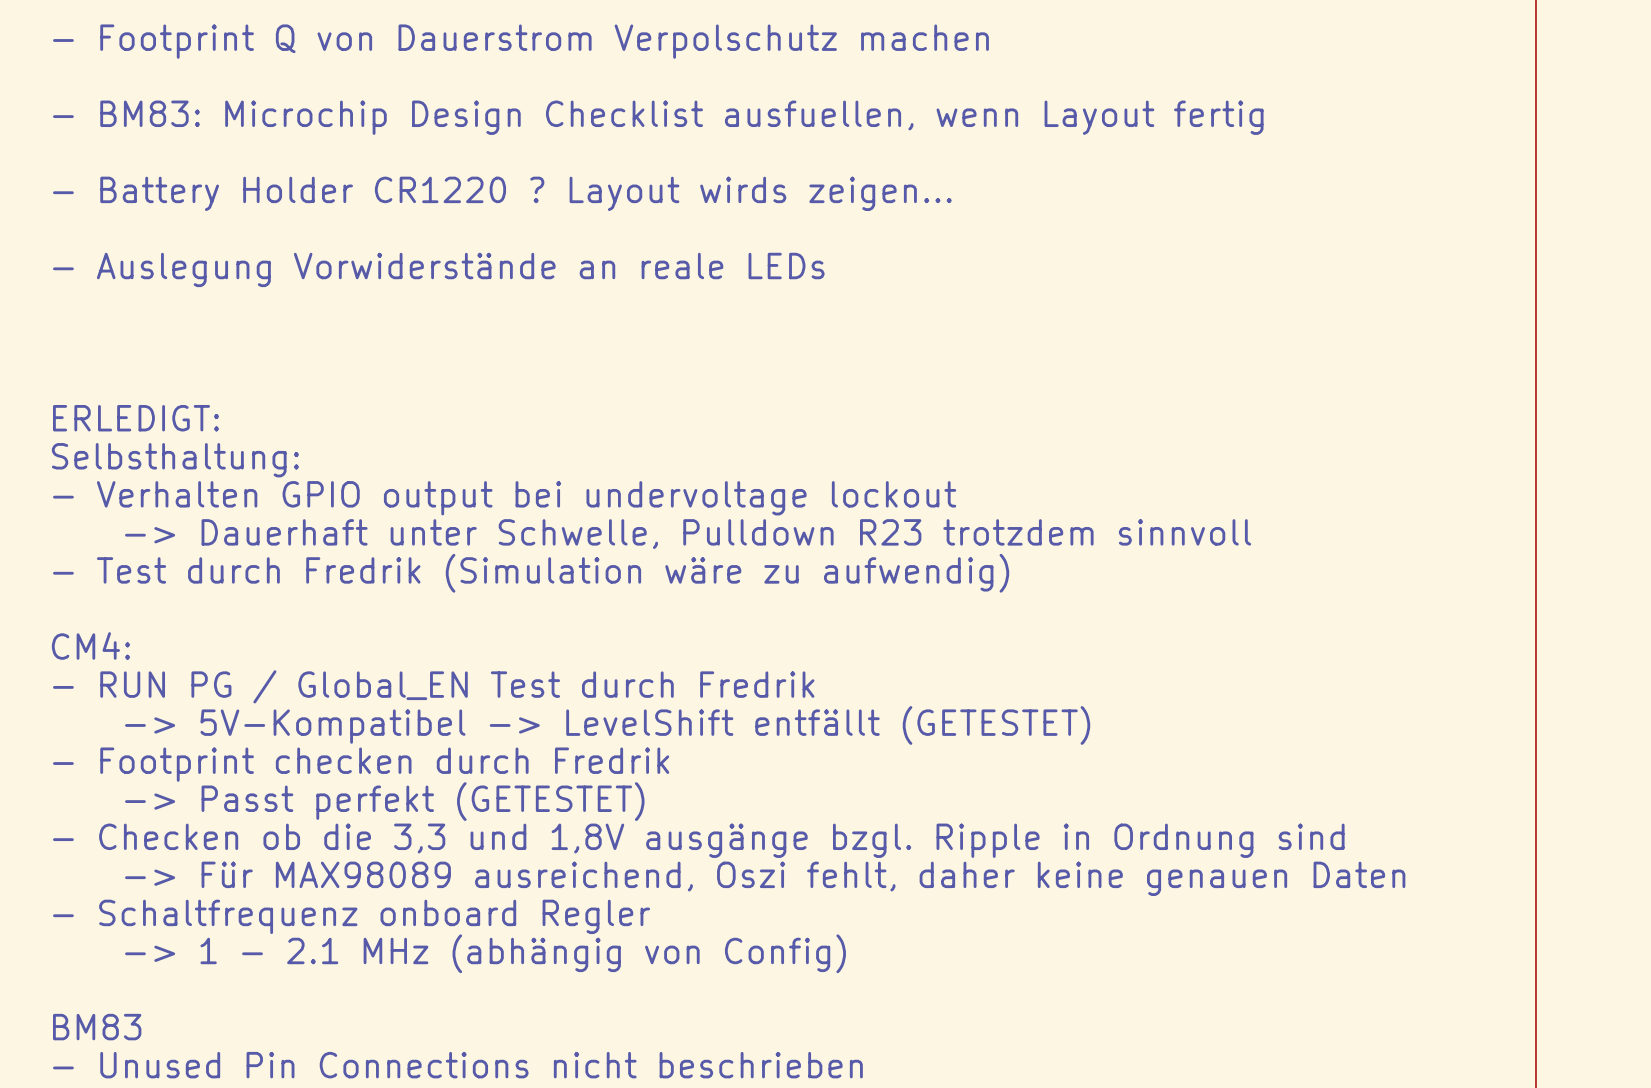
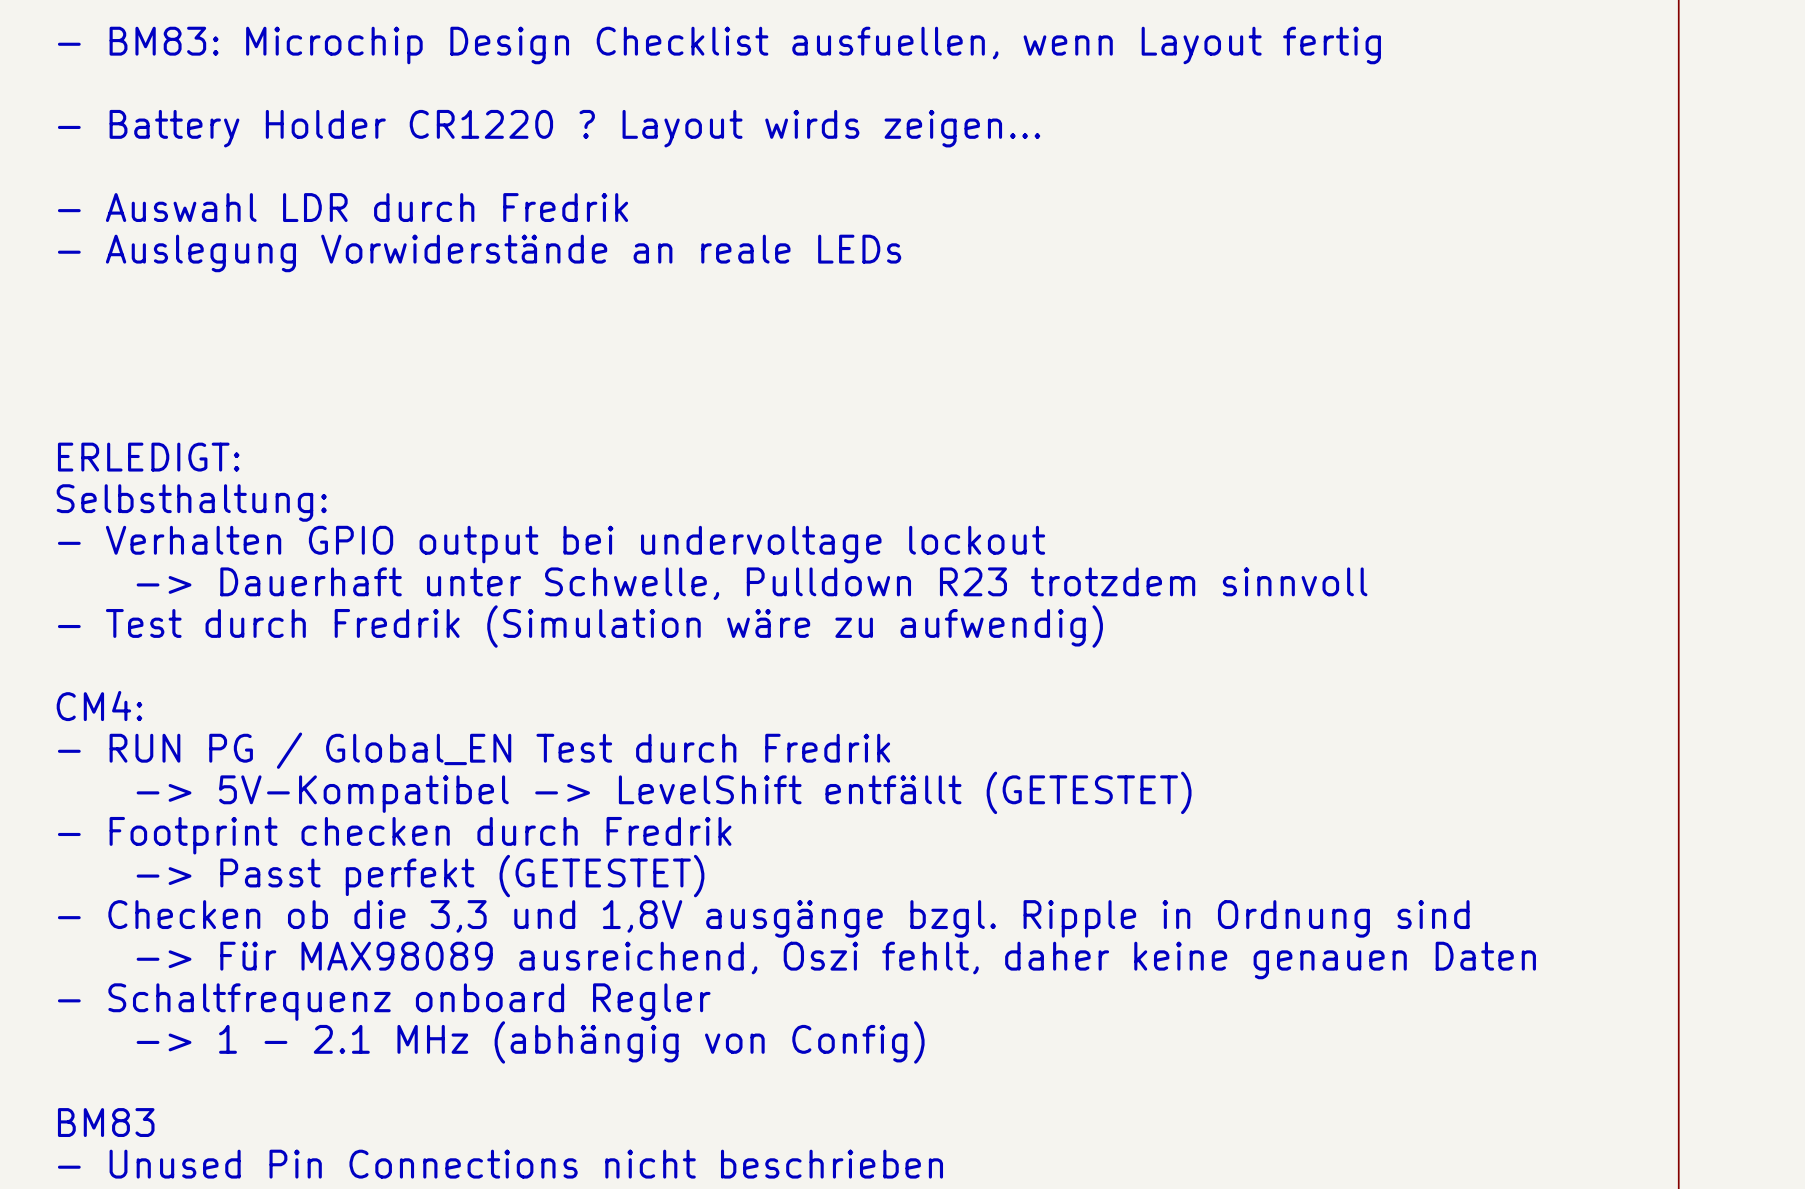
text: - Footprint Q von Dauerstrom Verpolschutz machen (520, 41) -> - BM83: Microchip Design Checklist ausfuellen, wenn Layout fertig (719, 45)
text: - BM83: Microchip Design Checklist ausfuellen, wenn Layout fertig (658, 117) -> - Battery Holder CR1220 ? Layout wirds zeigen… (549, 128)
text: - Battery Holder CR1220 ? Layout wirds zeigen… (502, 193) -> - Auswahl LDR durch Fredrik (343, 207)
text position: - Auslegung Vorwiderstände an reale LEDs (438, 269) -> - Auslegung Vorwiderstände an reale LEDs (479, 253)

